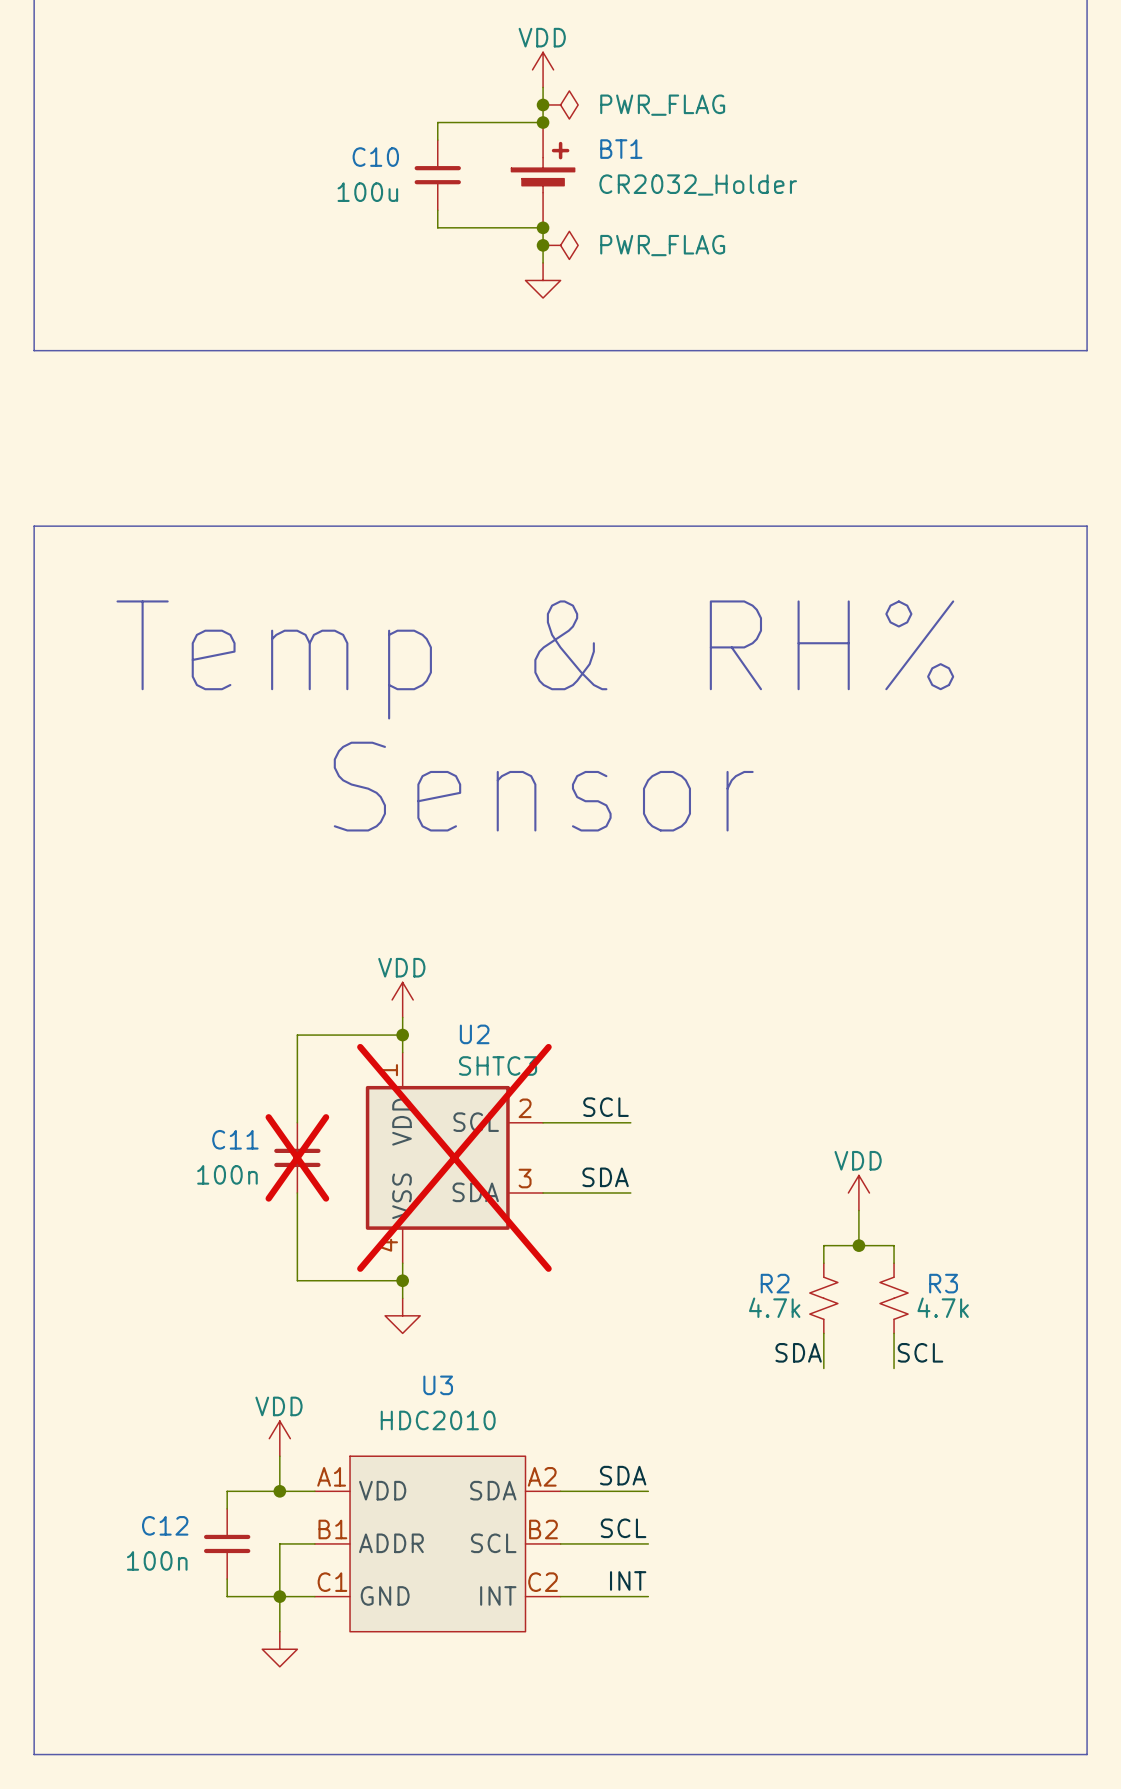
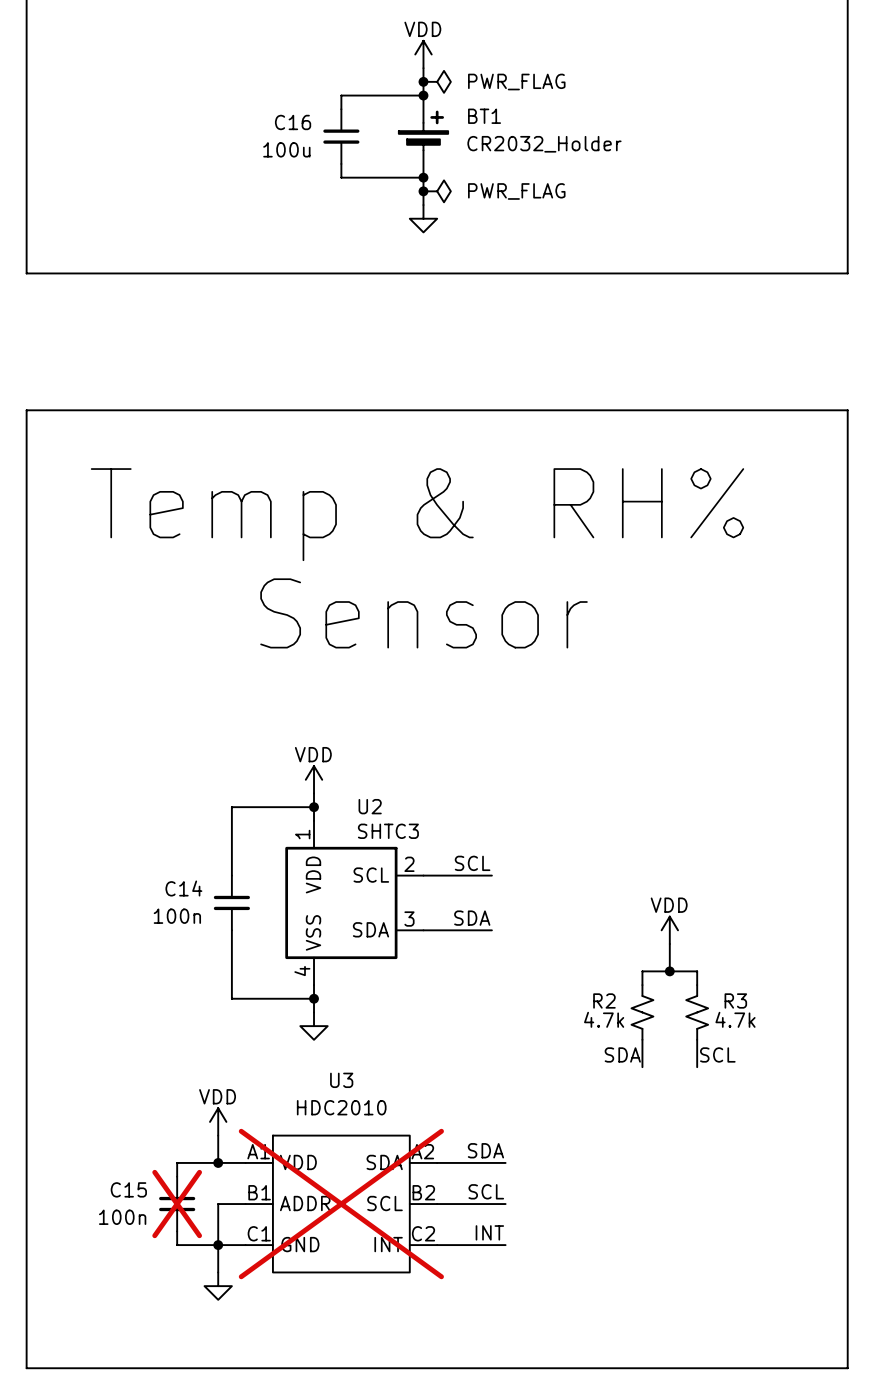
C10 name: C10 (375, 157) -> C16 (293, 122)
C11 name: C11 (235, 1139) -> C14 (183, 888)
C11 do-not-place cross: (297, 1157) -> none
U2 do-not-place cross: (454, 1157) -> none
C12 name: C12 (165, 1525) -> C15 (128, 1189)
C12 do-not-place cross: none -> (177, 1204)
U3 do-not-place cross: none -> (341, 1204)

